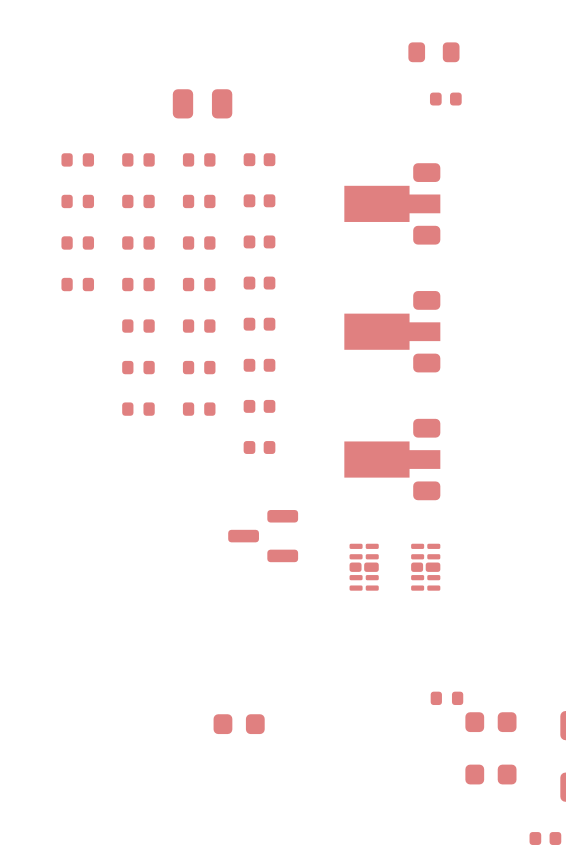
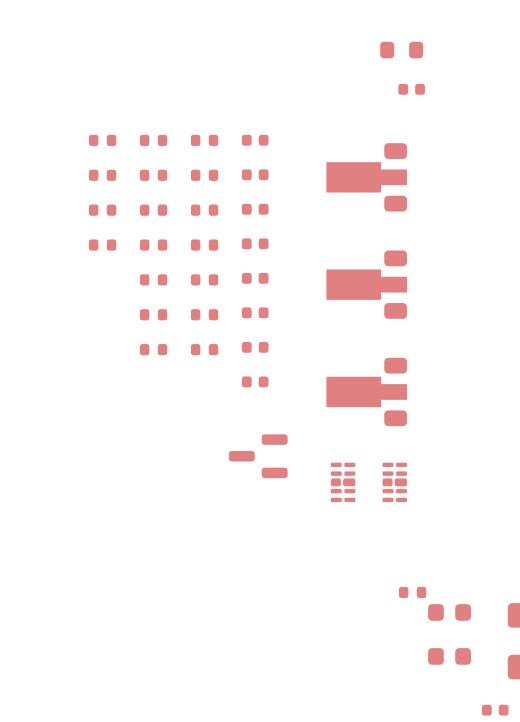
part: (202, 103) -> none
part: (239, 724) -> none

